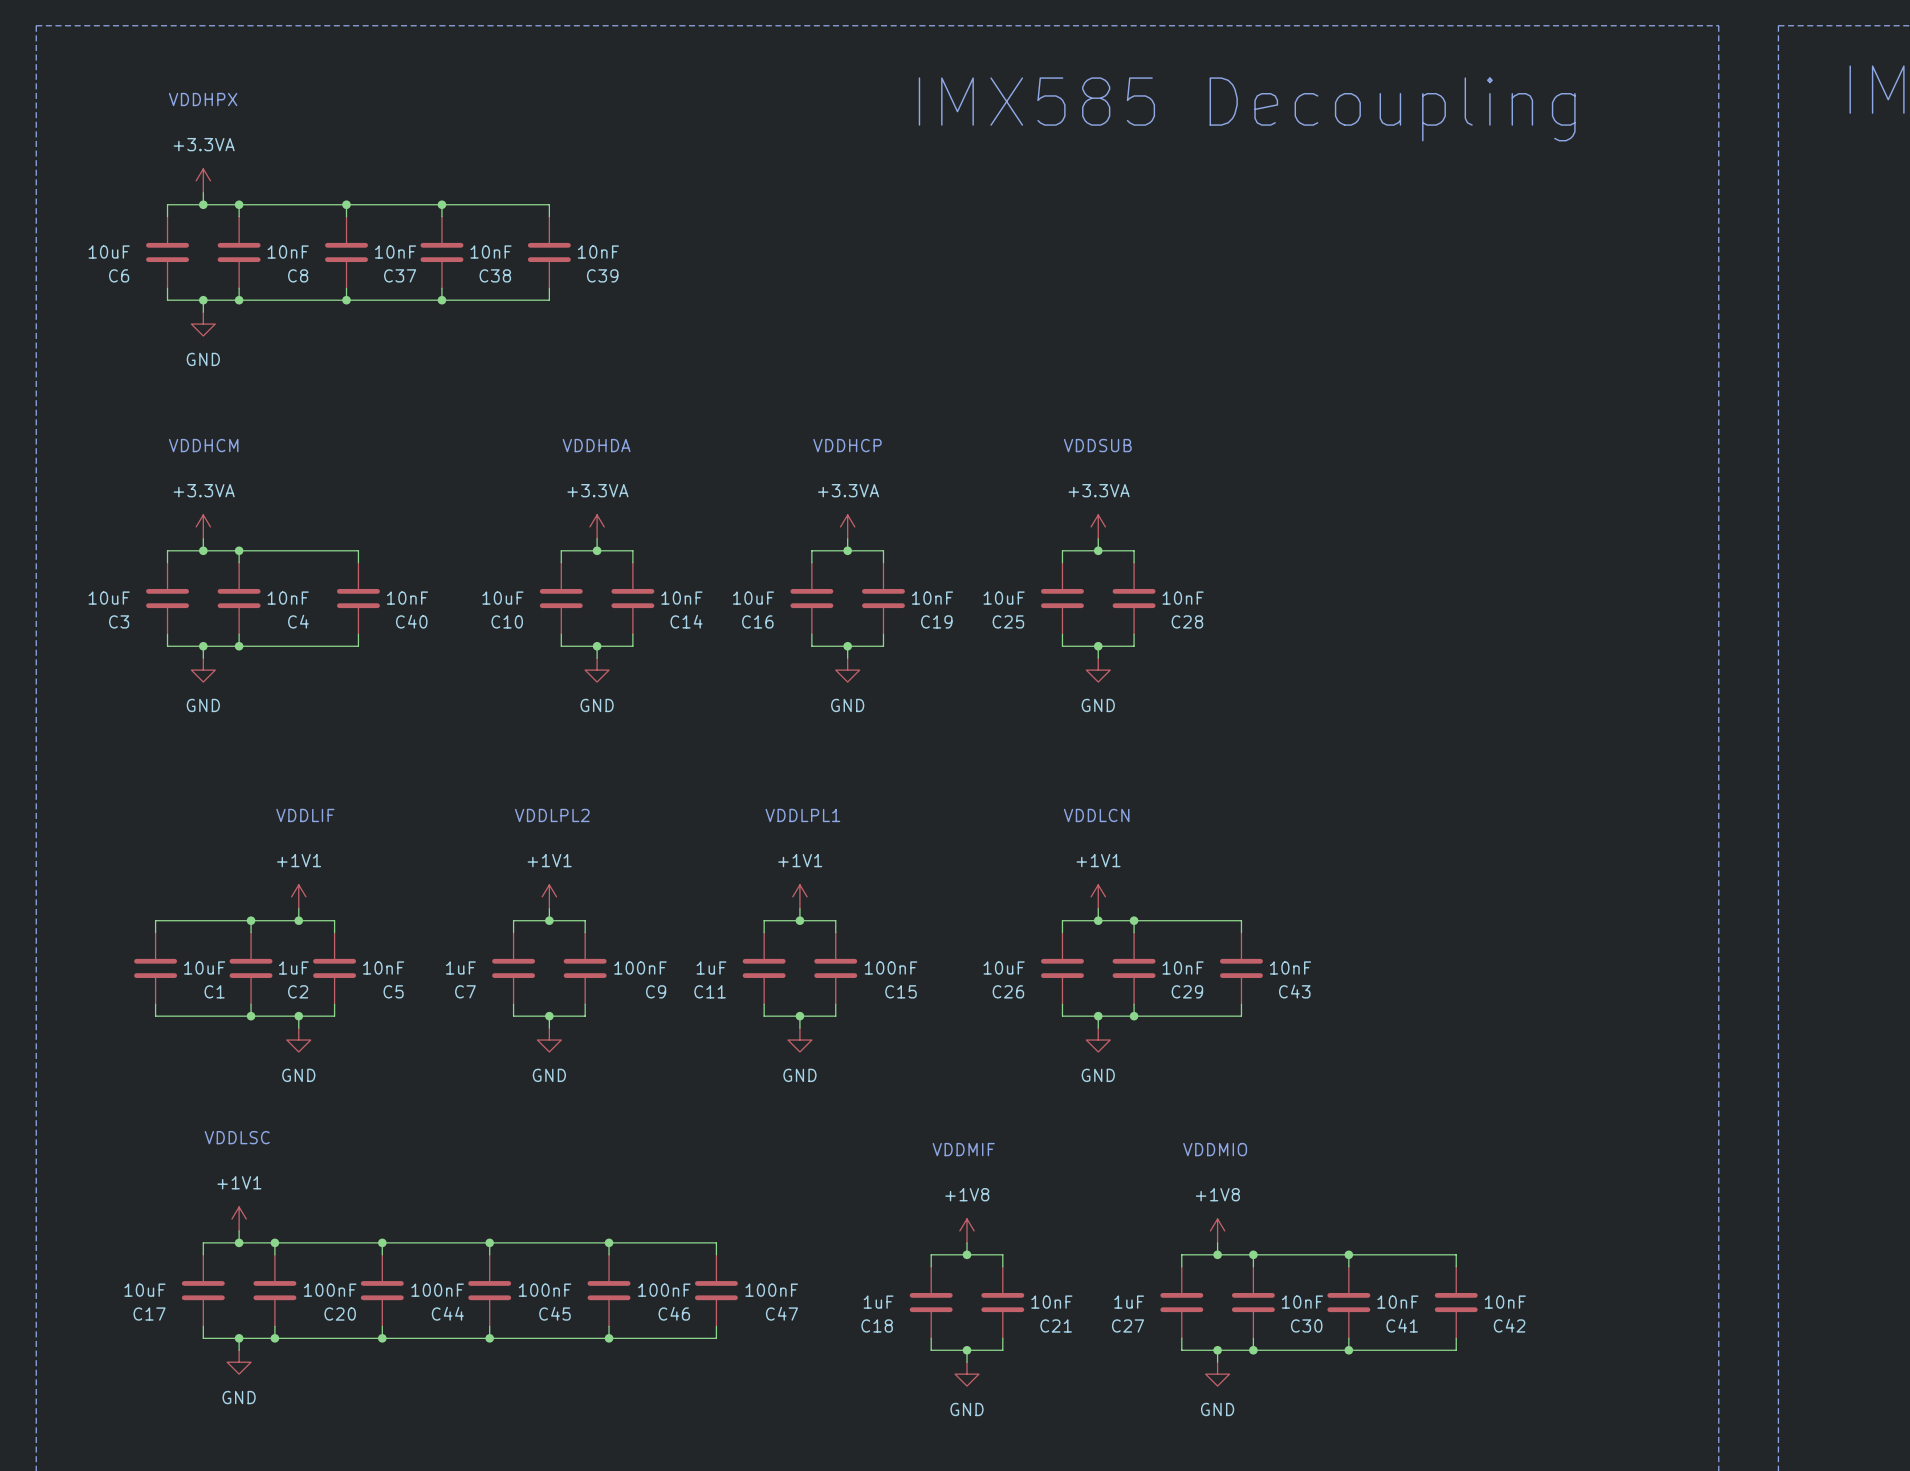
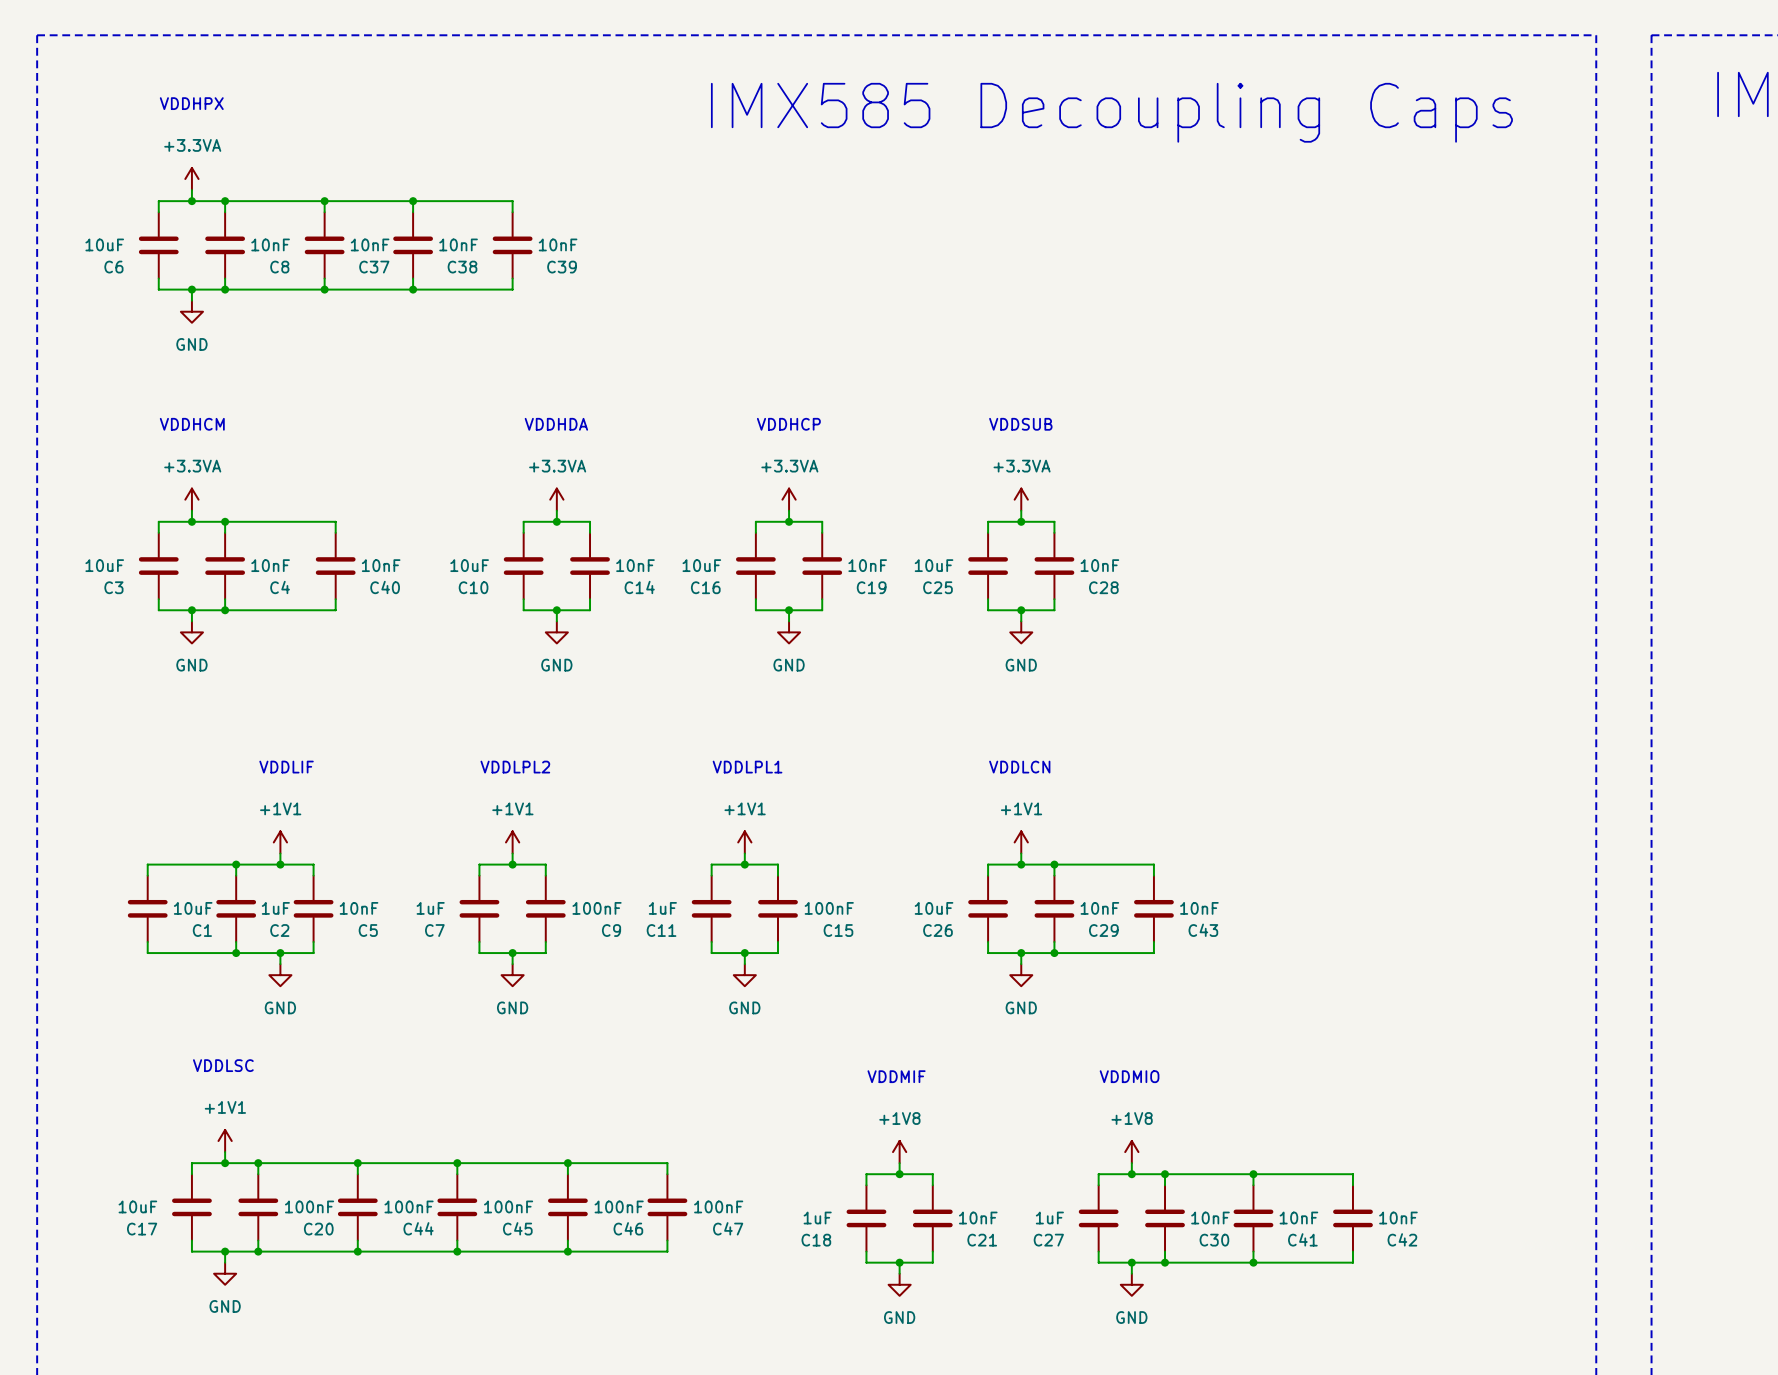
text: IMX585 Decoupling (1247, 109) -> IMX585 Decoupling Caps (1111, 112)

